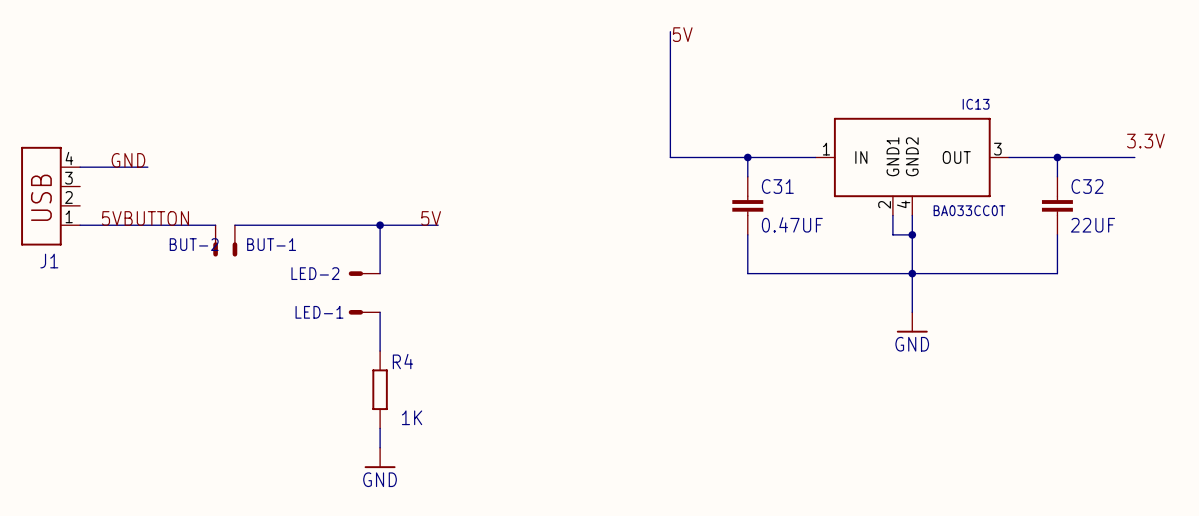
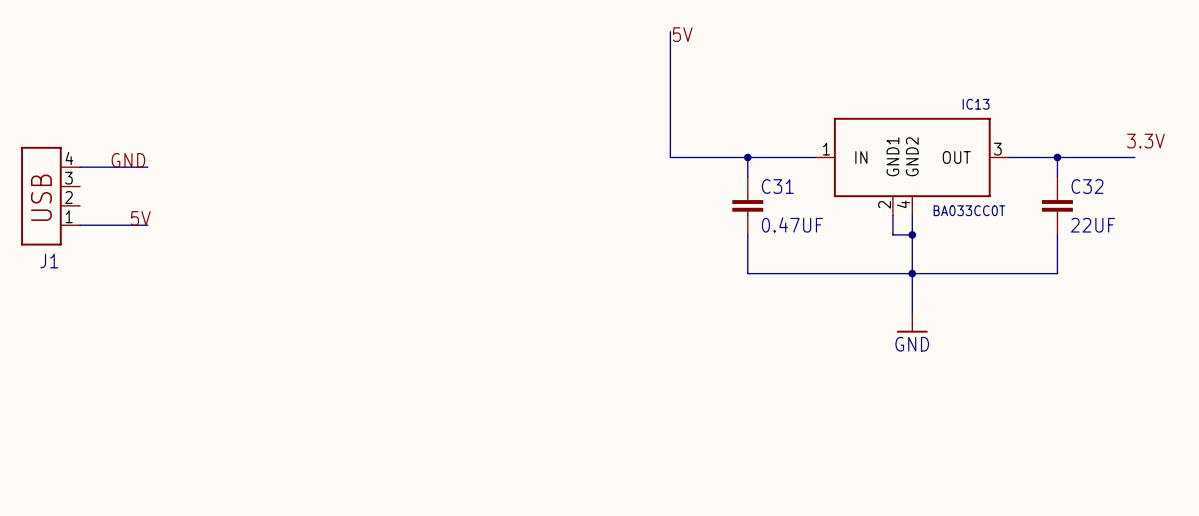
label: none -> 5V (140, 218)
label: 5VBUTTON (145, 218) -> none
label: 5V (431, 218) -> none
wire: (147, 225) (215, 225) -> none
wire: (234, 225) (438, 225) -> none
wire: (380, 225) (380, 273) -> none
junction: (380, 225) -> none
BUT-2: (215, 240) -> none
BUT-1: (234, 240) -> none
LED-2: (364, 273) -> none
LED-1: (364, 312) -> none
wire: (380, 312) (380, 351) -> none
R4: 1K (380, 389) -> none
wire: (380, 428) (380, 447) -> none
power symbol: GND (380, 457) -> none

